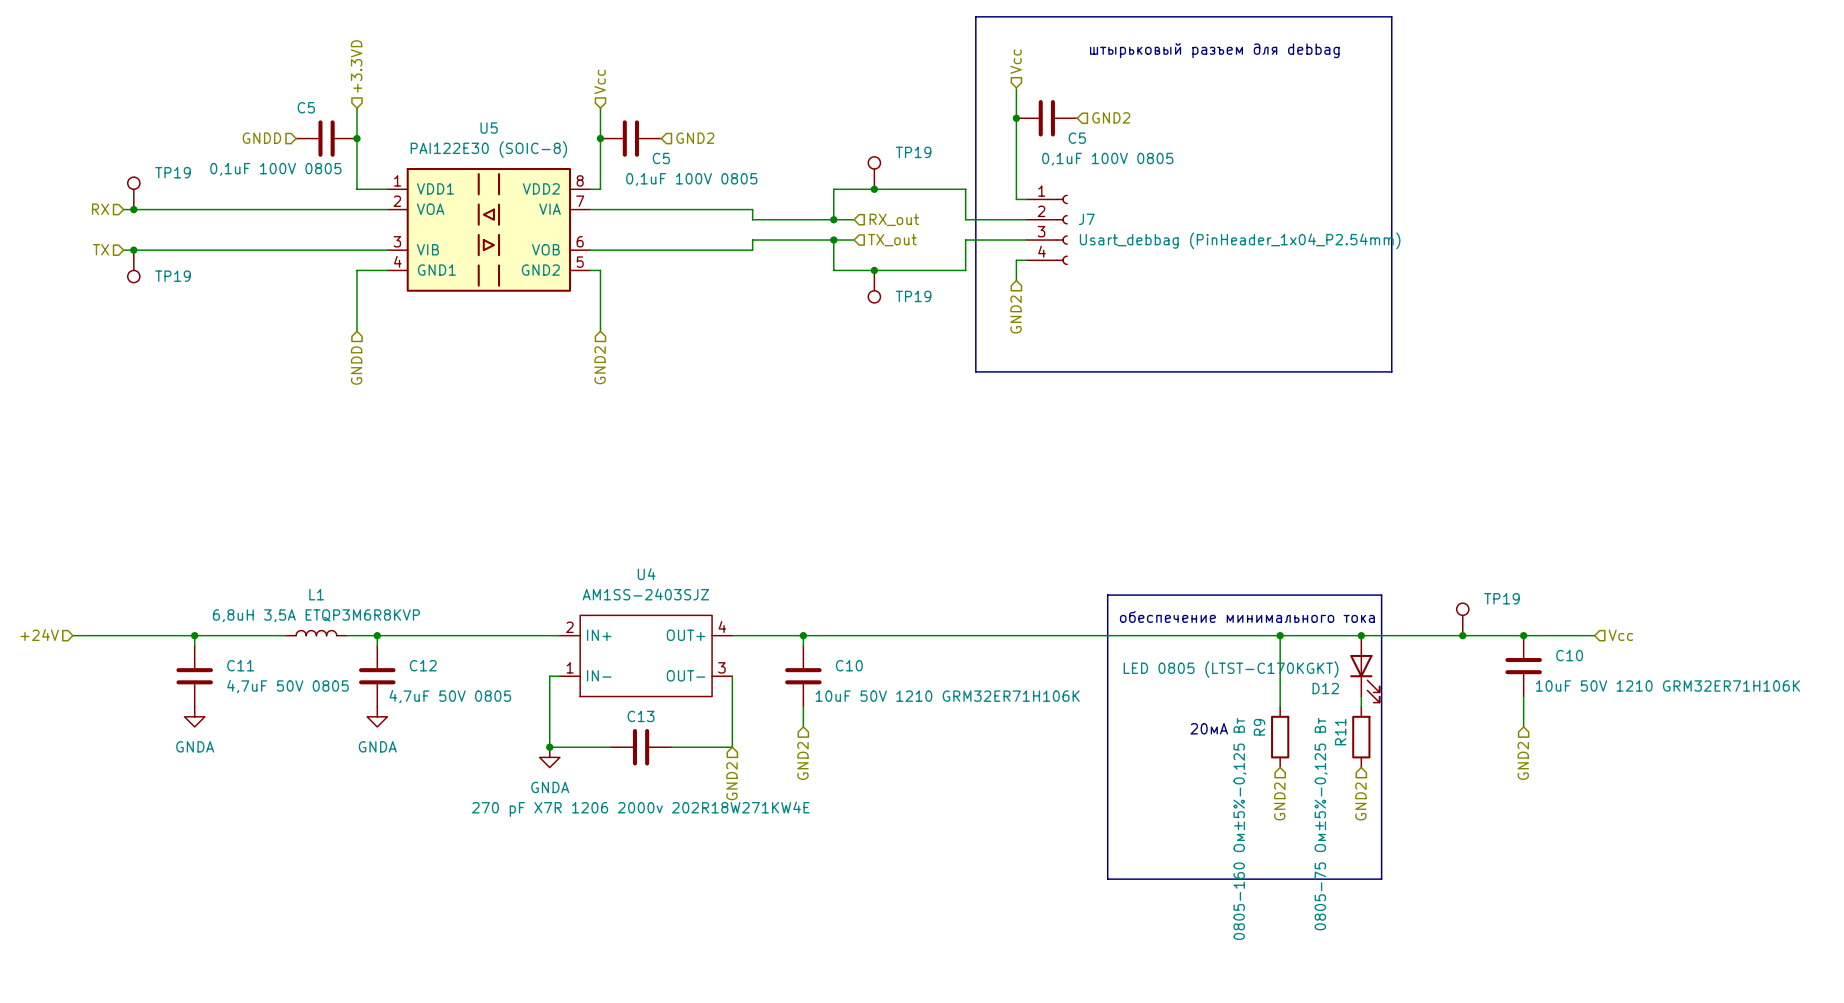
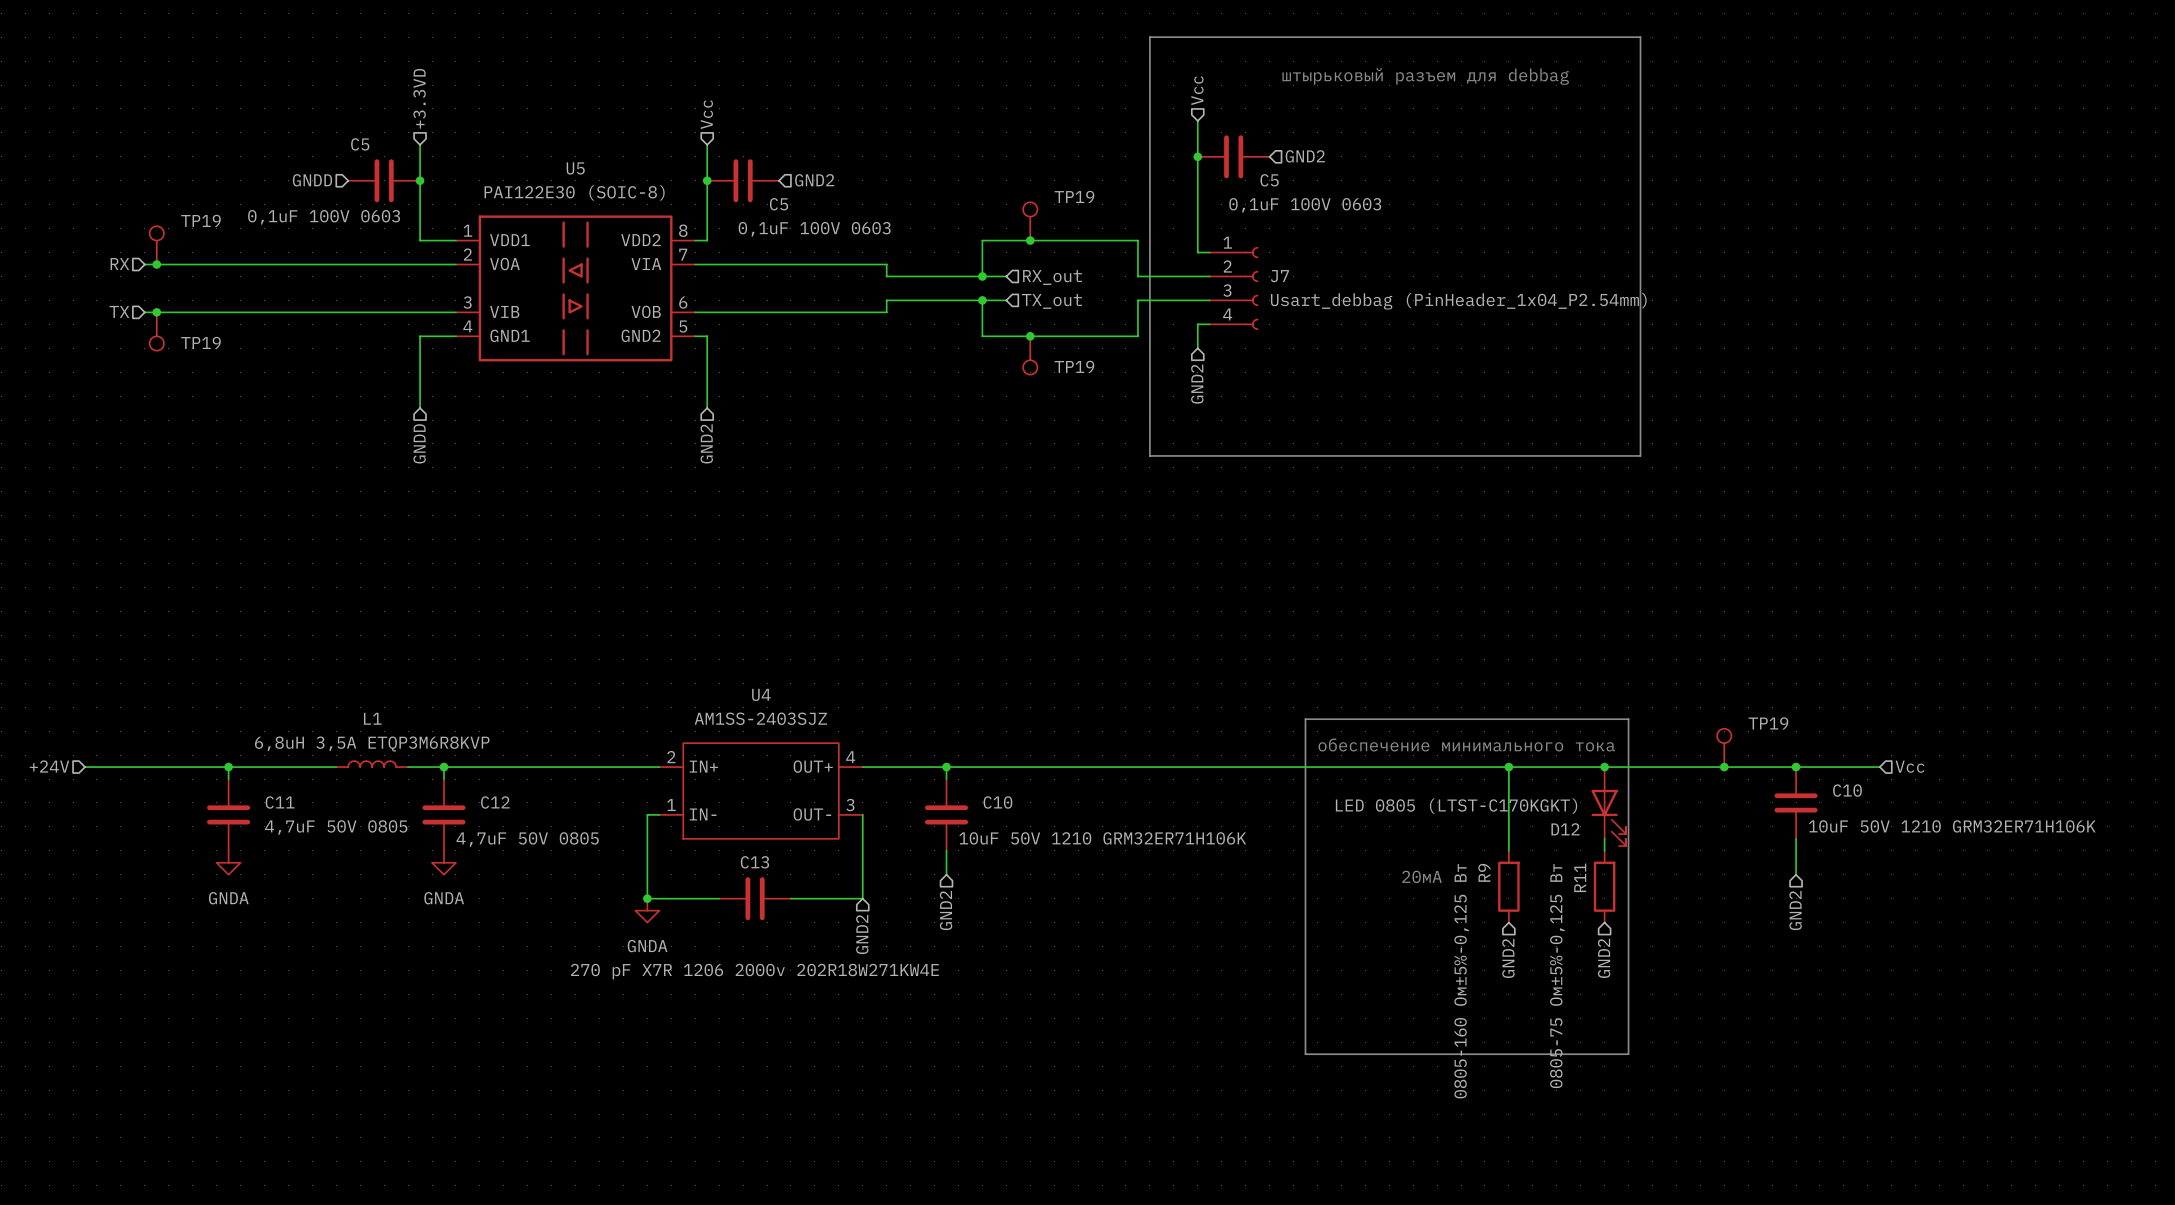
C5 value: 0,1uF 100V 0805 (1107, 159) -> 0,1uF 100V 0603 (1305, 205)
C5 value: 0,1uF 100V 0805 (275, 169) -> 0,1uF 100V 0603 (324, 217)
C5 value: 0,1uF 100V 0805 (691, 179) -> 0,1uF 100V 0603 (814, 229)

